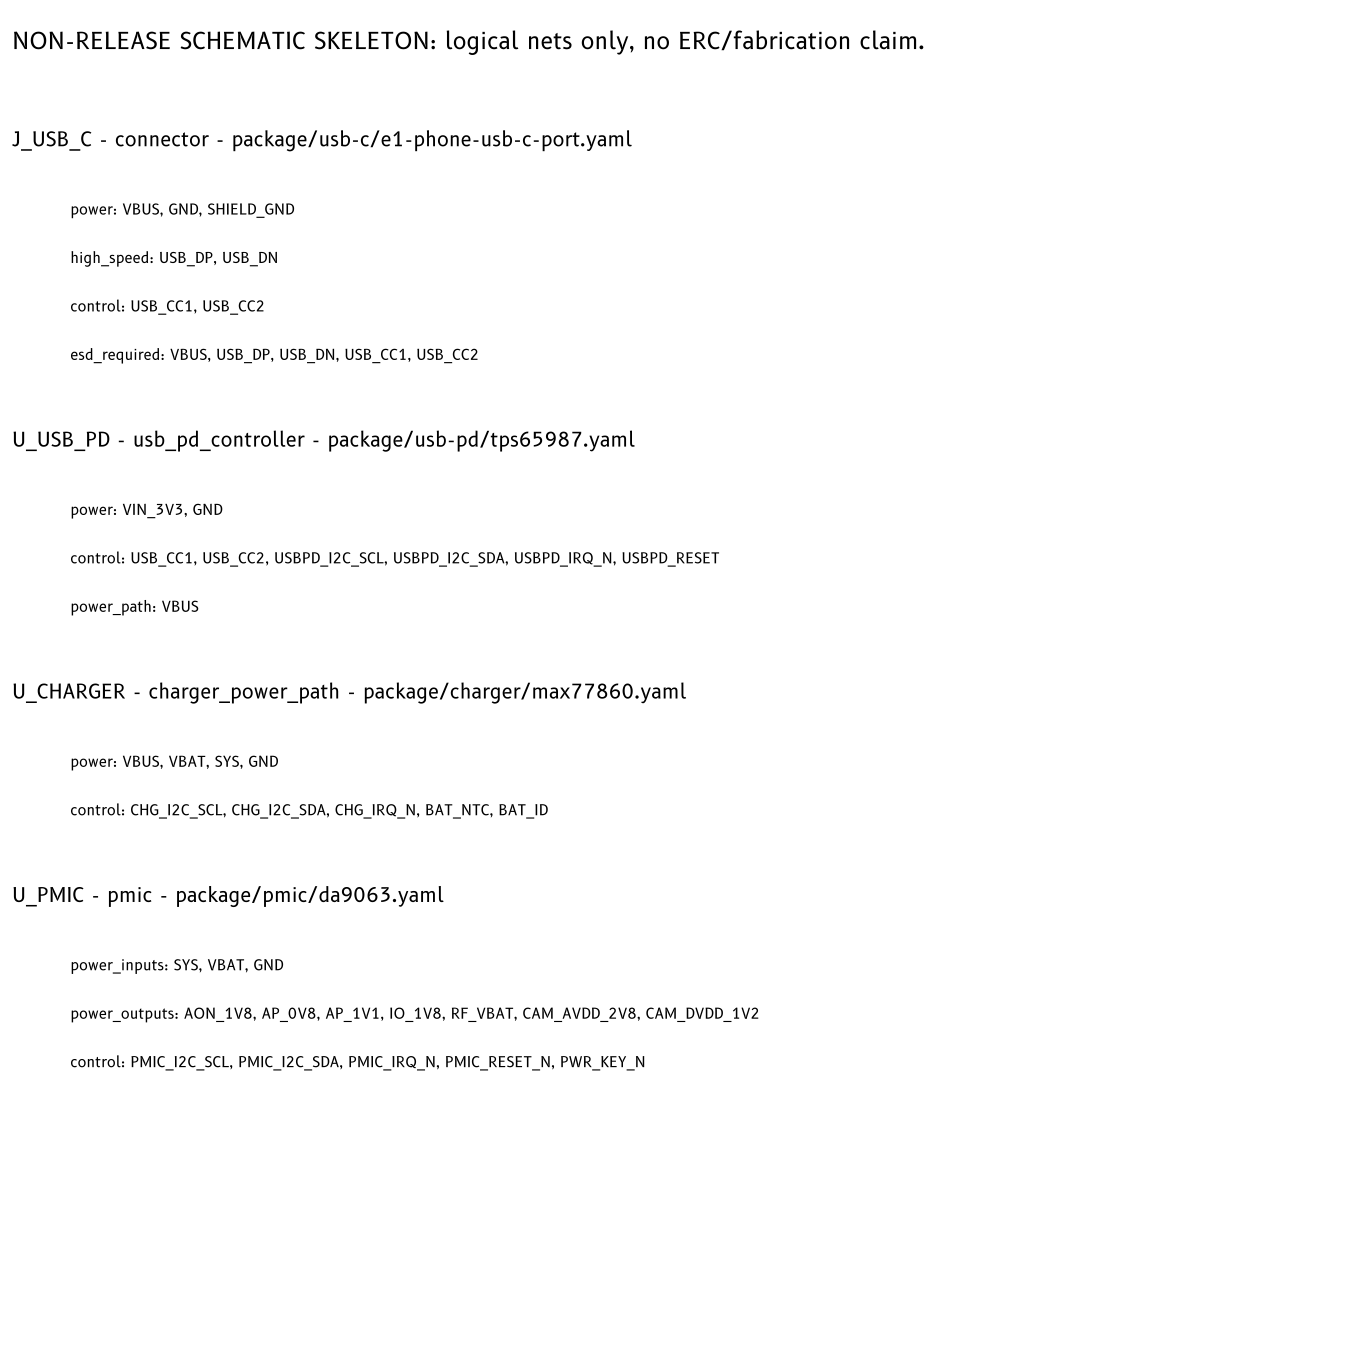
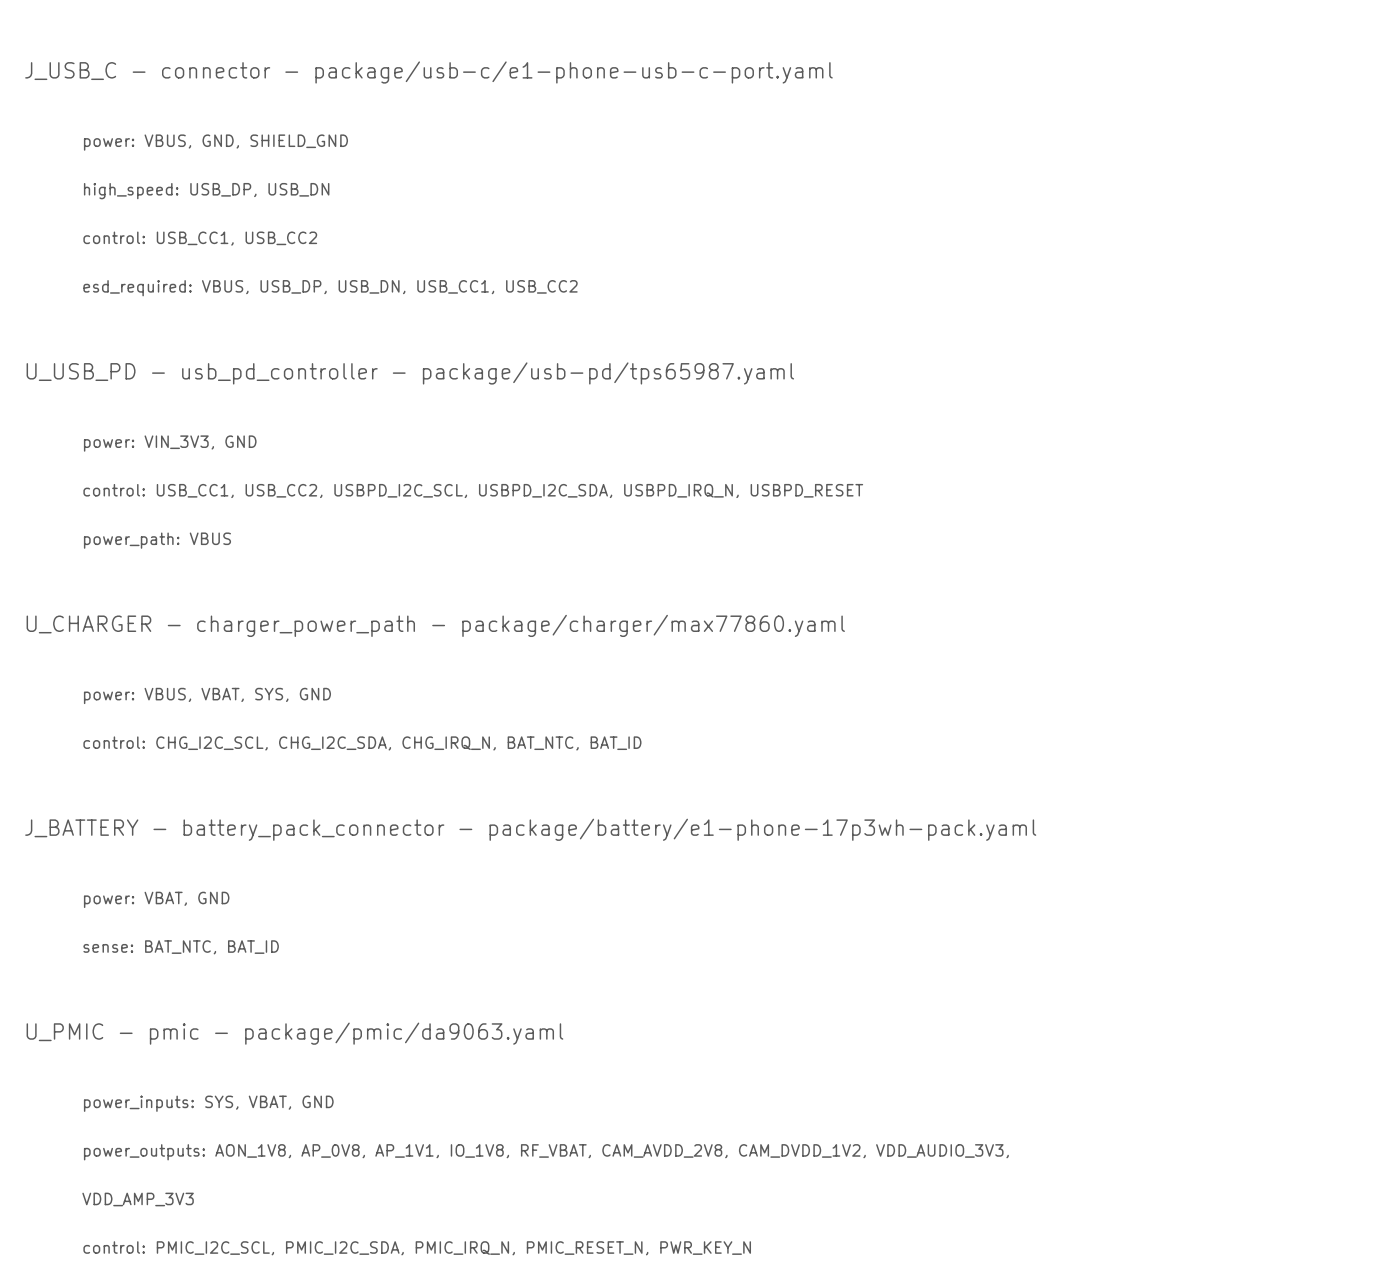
text: U_PMIC - pmic - package/pmic/da9063.yaml (228, 896) -> J_BATTERY - battery_pack_connector - package/battery/e1-phone-17p3wh-pack.yaml (530, 829)
text: power_inputs: SYS, VBAT, GND (177, 966) -> power: VBAT, GND (156, 899)
text: power_outputs: AON_1V8, AP_0V8, AP_1V1, IO_1V8, RF_VBAT, CAM_AVDD_2V8, CAM_DVDD_1V2 (414, 1014) -> sense: BAT_NTC, BAT_ID (181, 947)
text: control: PMIC_I2C_SCL, PMIC_I2C_SDA, PMIC_IRQ_N, PMIC_RESET_N, PWR_KEY_N (357, 1062) -> none
text: none -> U_PMIC - pmic - package/pmic/da9063.yaml (294, 1033)
text: none -> power_inputs: SYS, VBAT, GND (208, 1103)
text: none -> power_outputs: AON_1V8, AP_0V8, AP_1V1, IO_1V8, RF_VBAT, CAM_AVDD_2V8, CAM_DVDD_1V2, VDD_AUDIO_3V3, (546, 1152)
text: none -> VDD_AMP_3V3 (138, 1199)
text: none -> control: PMIC_I2C_SCL, PMIC_I2C_SDA, PMIC_IRQ_N, PMIC_RESET_N, PWR_KEY_N (417, 1248)

